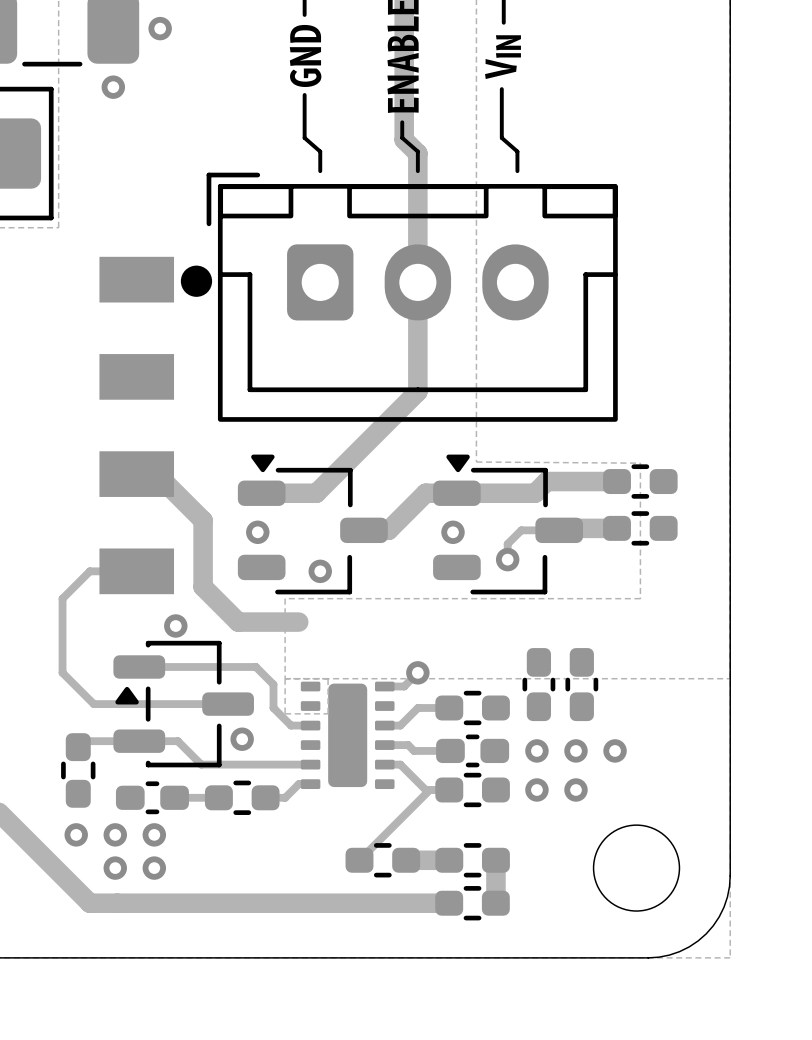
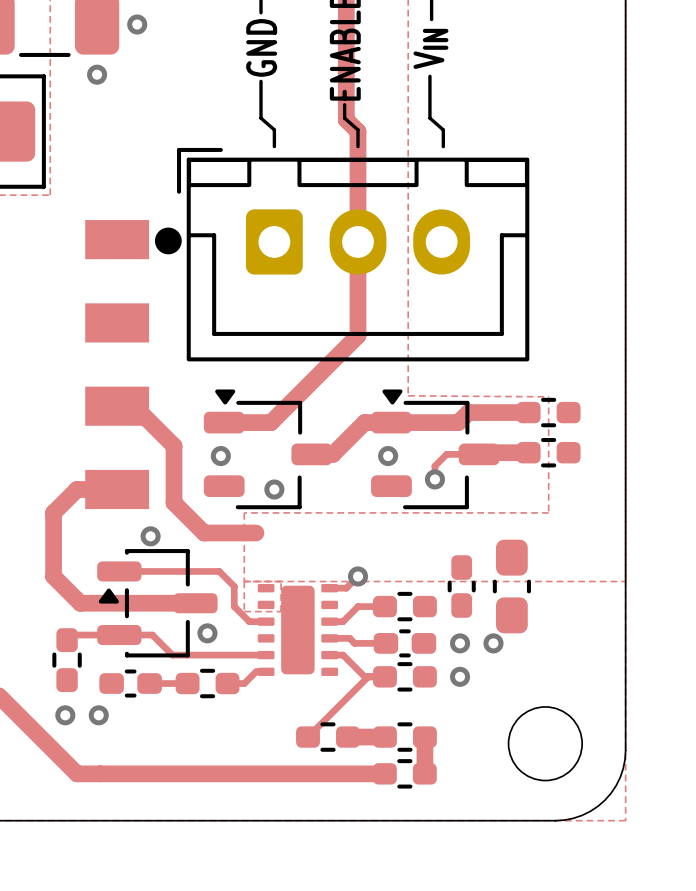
track width: thin (136, 571) (89, 571) (62, 598) (62, 672) (93, 704) (228, 704) -> thick (117, 489) (77, 489) (53, 512) (53, 576) (80, 603) (195, 603)
part footprint: [565, 648, 599, 722] -> [492, 539, 531, 634]
via: (615, 750) -> none
via: (575, 789) -> none
via: (154, 834) -> none
via: (115, 868) -> none
via: (154, 868) -> none

